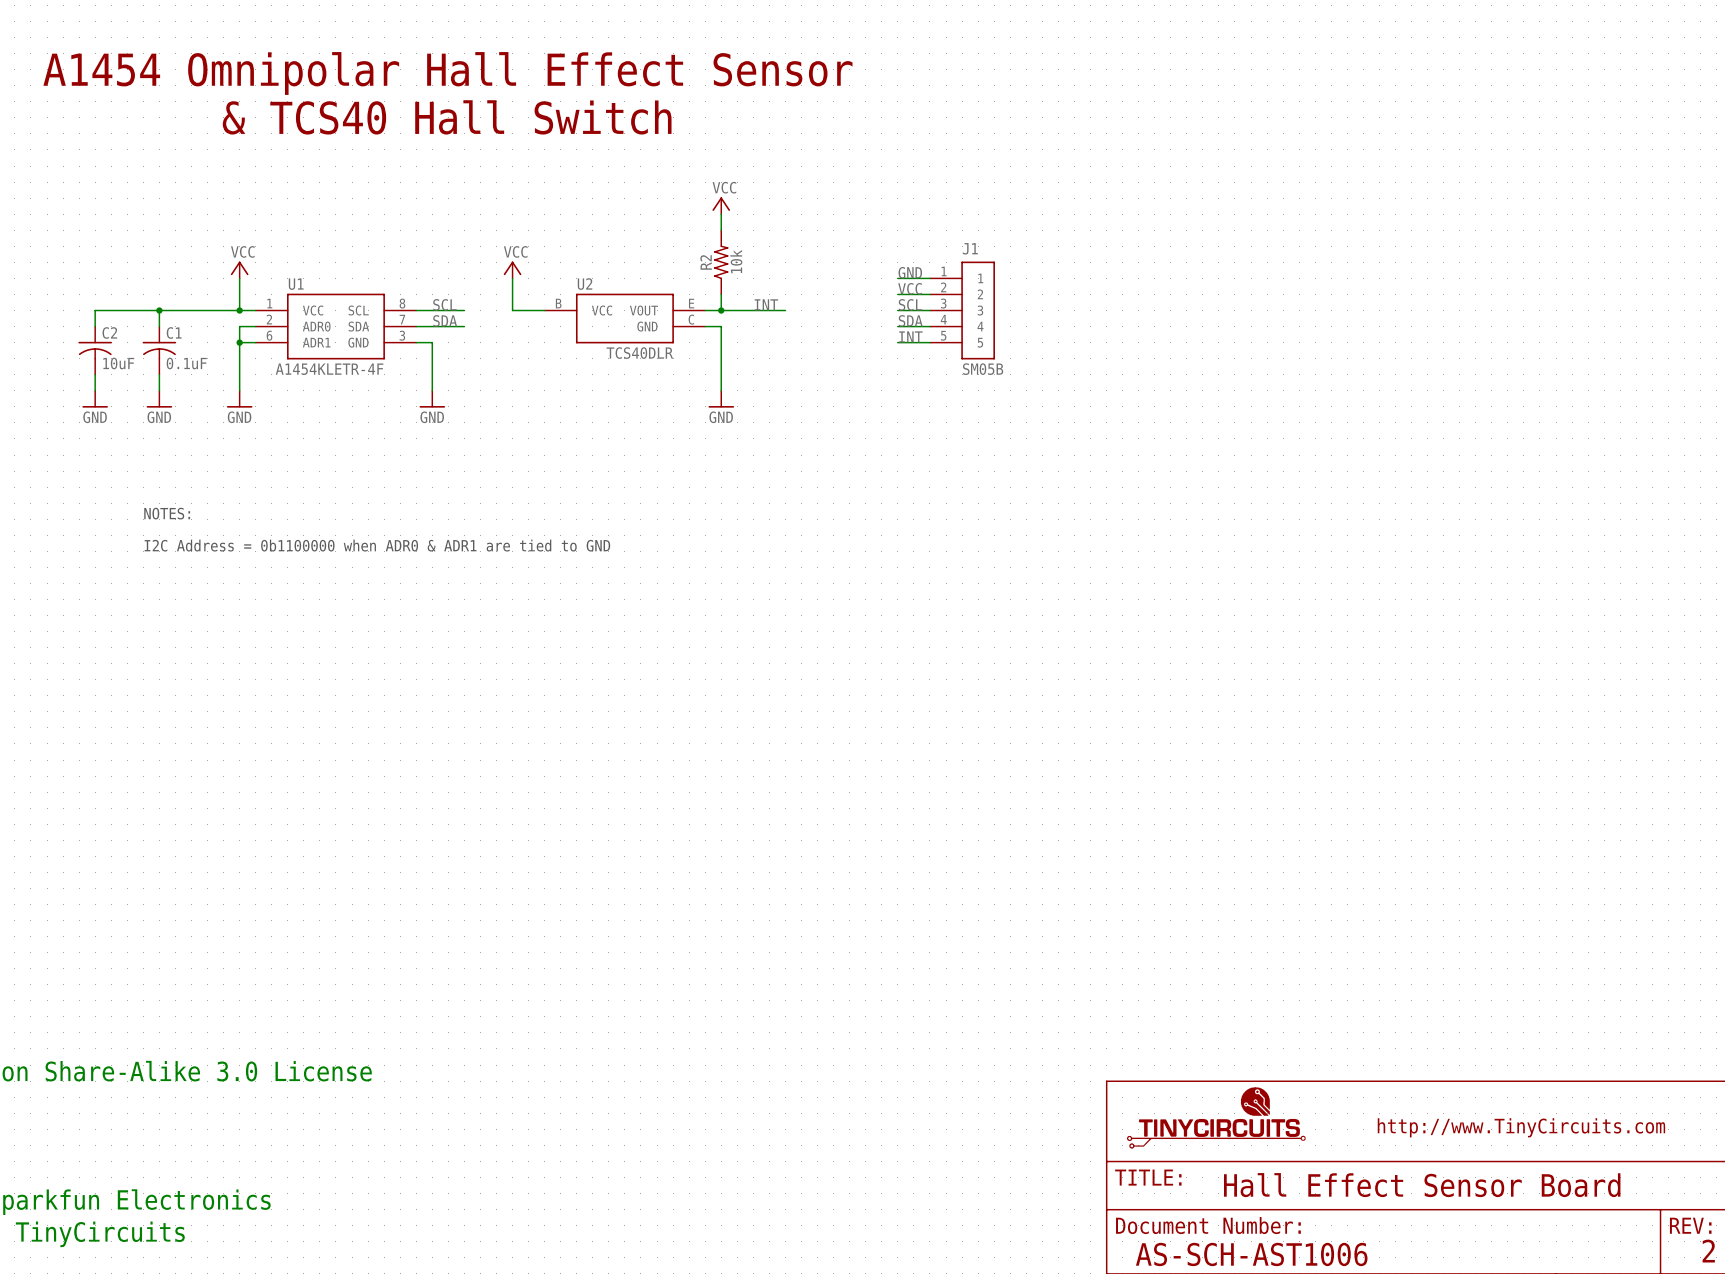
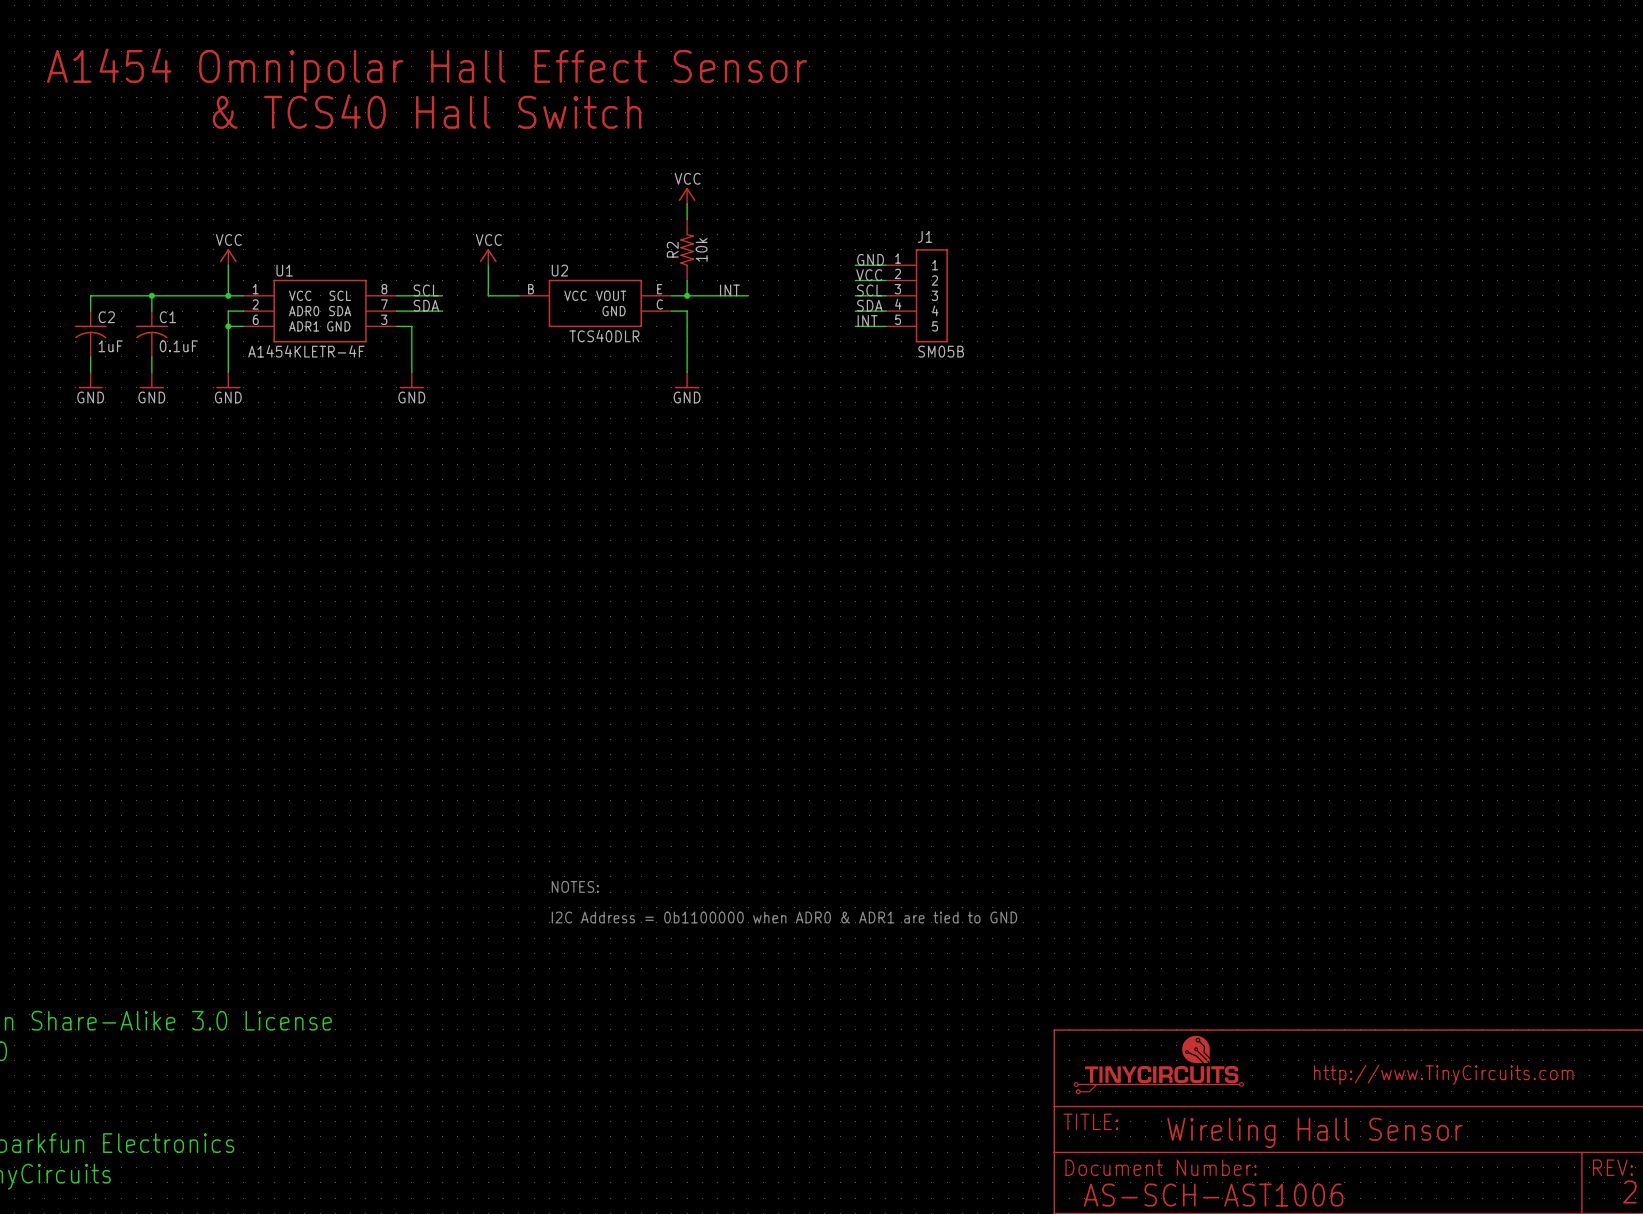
C2 value: 10uF (118, 363) -> 1uF (110, 346)
text: NOTES: (167, 513) -> none
text: I2C Address = 0b1100000 when ADR0 & ADR1 are tied to GND (377, 545) -> none
text: none -> NOTES: (575, 886)
text: none -> I2C Address = 0b1100000 when ADR0 & ADR1 are tied to GND (784, 917)
text: Hall Effect Sensor Board (1422, 1185) -> Wireling Hall Sensor (1314, 1132)

